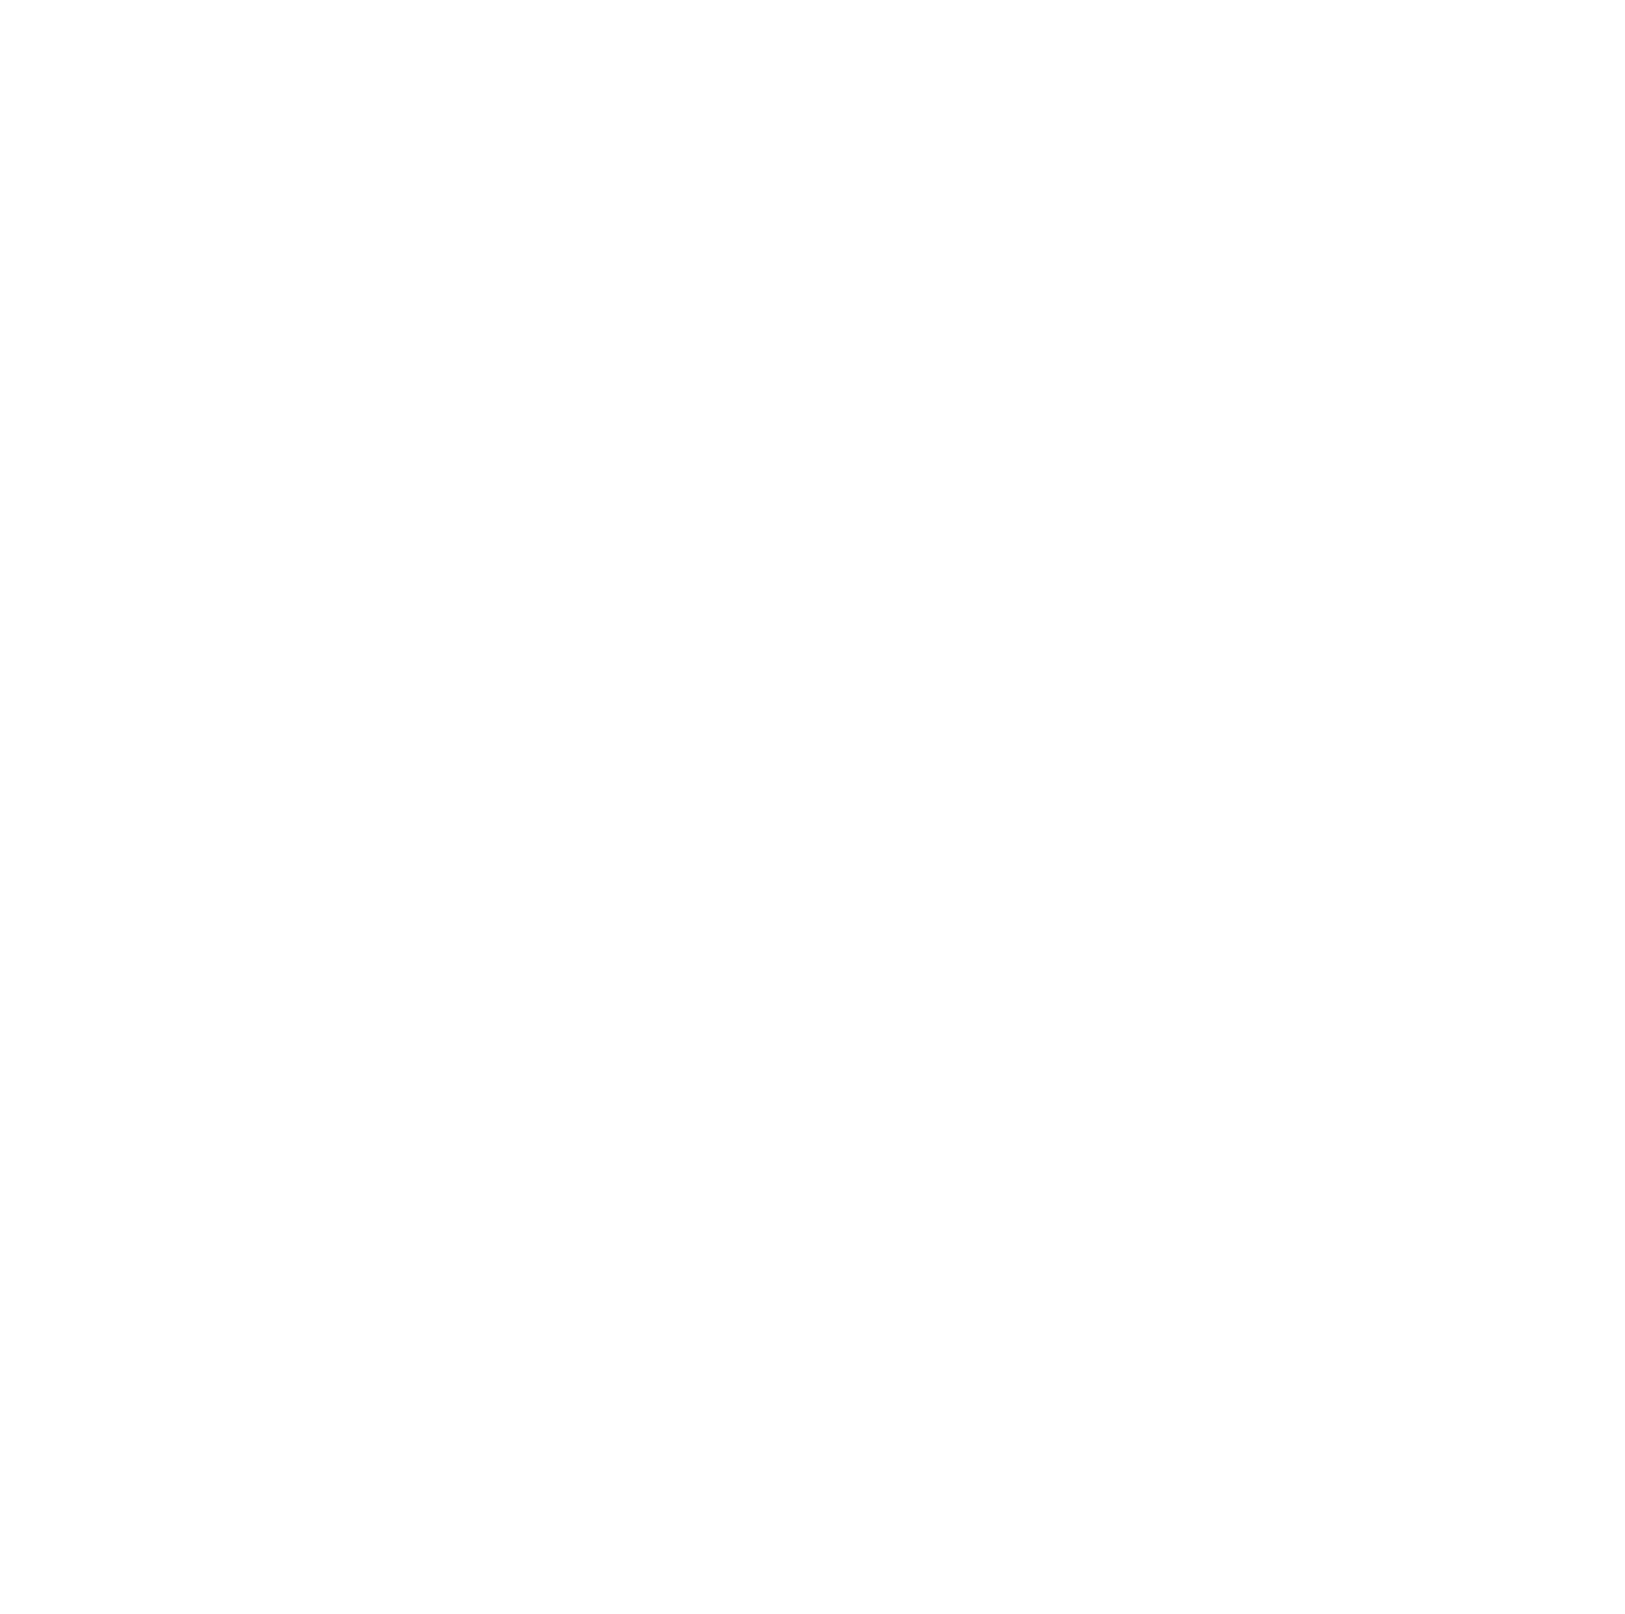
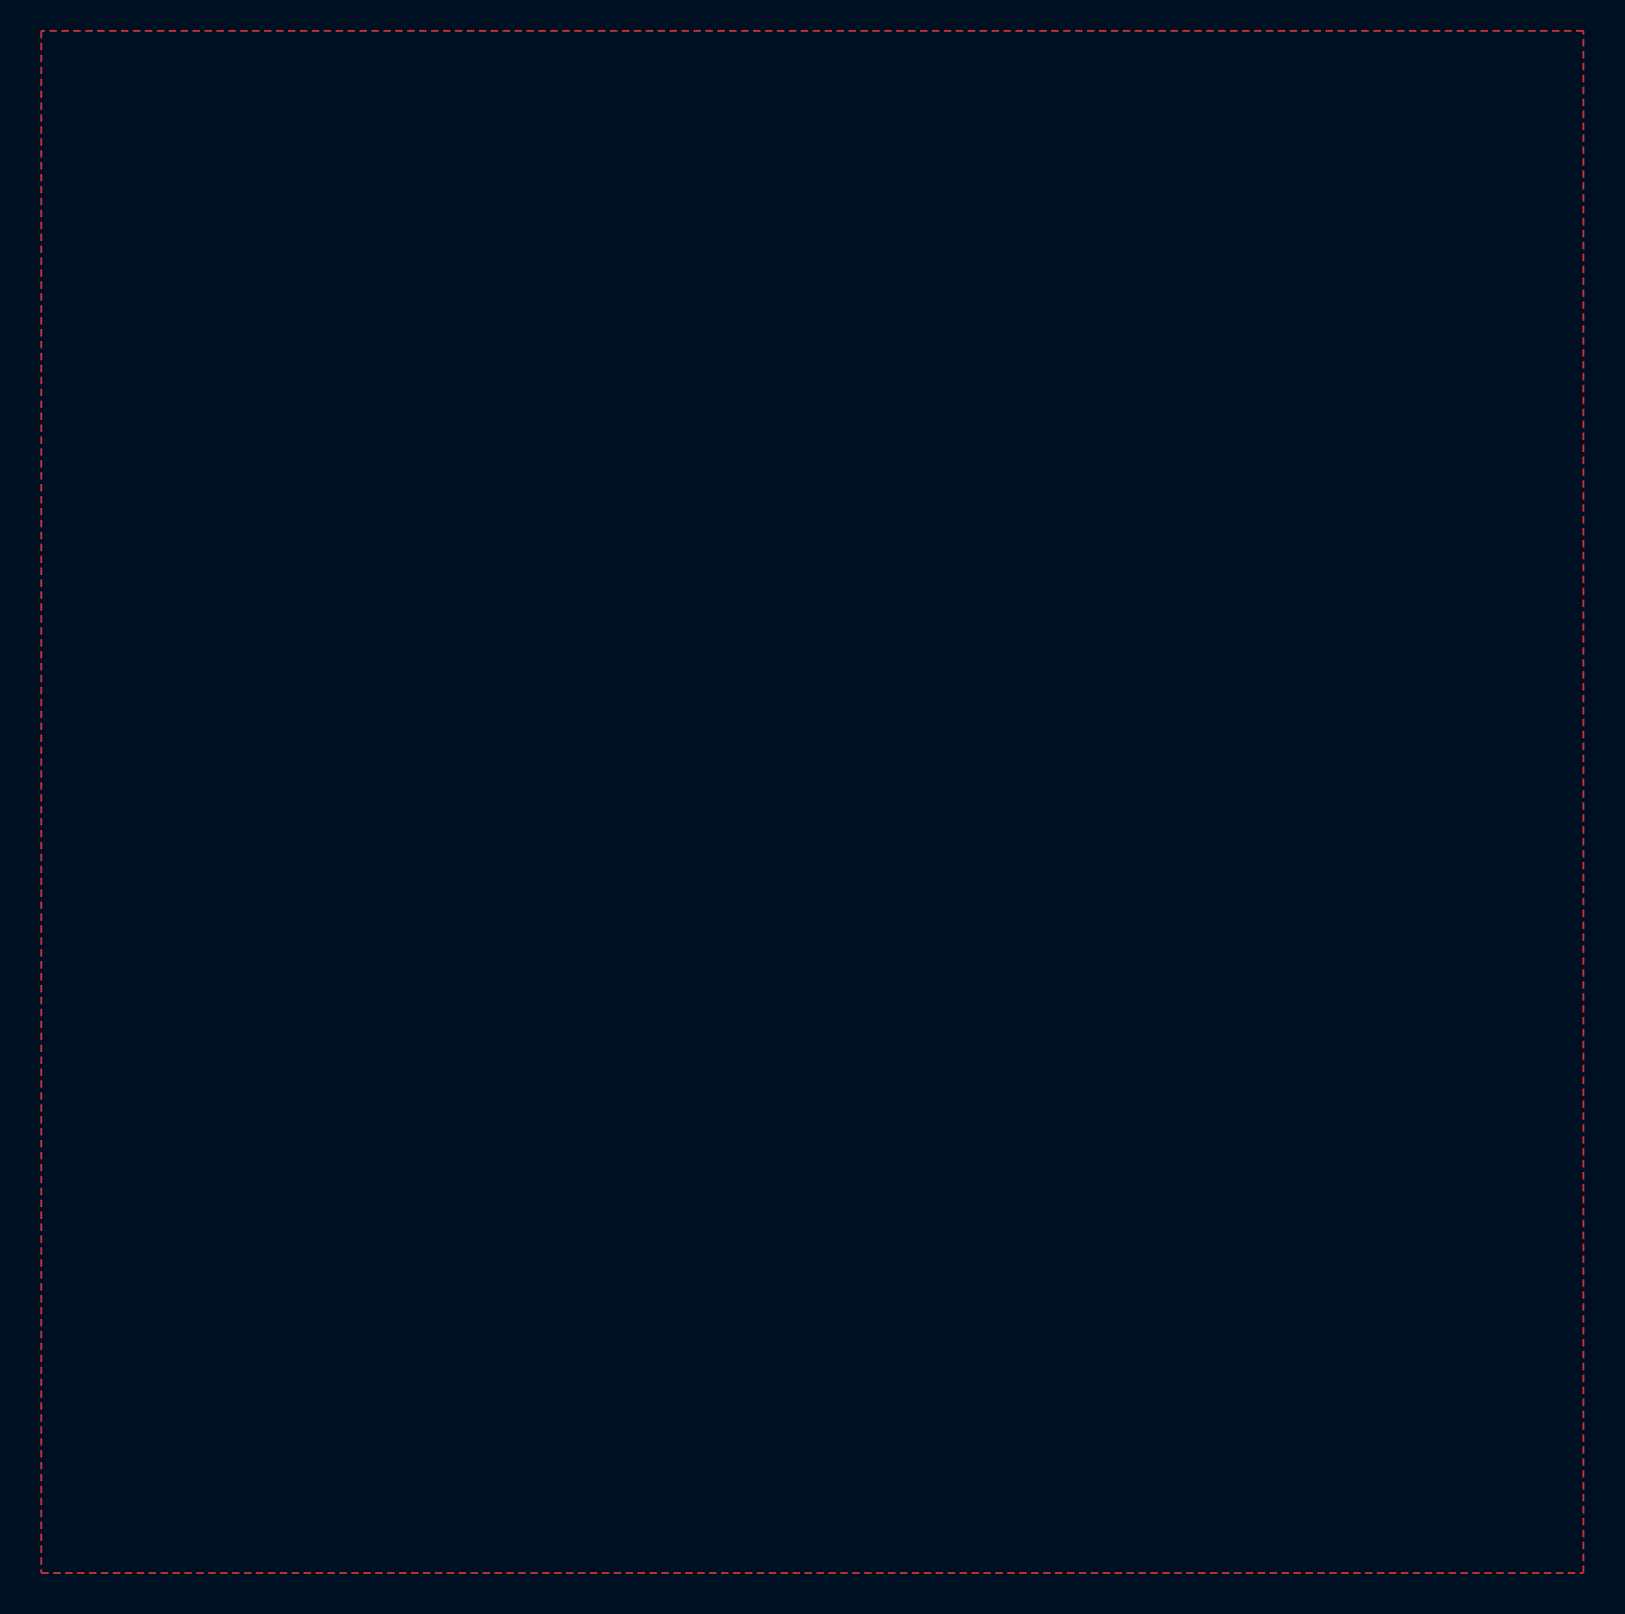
top zone outline: none -> (41, 30) (41, 1573) (1583, 1573) (1583, 30) (41, 30)

